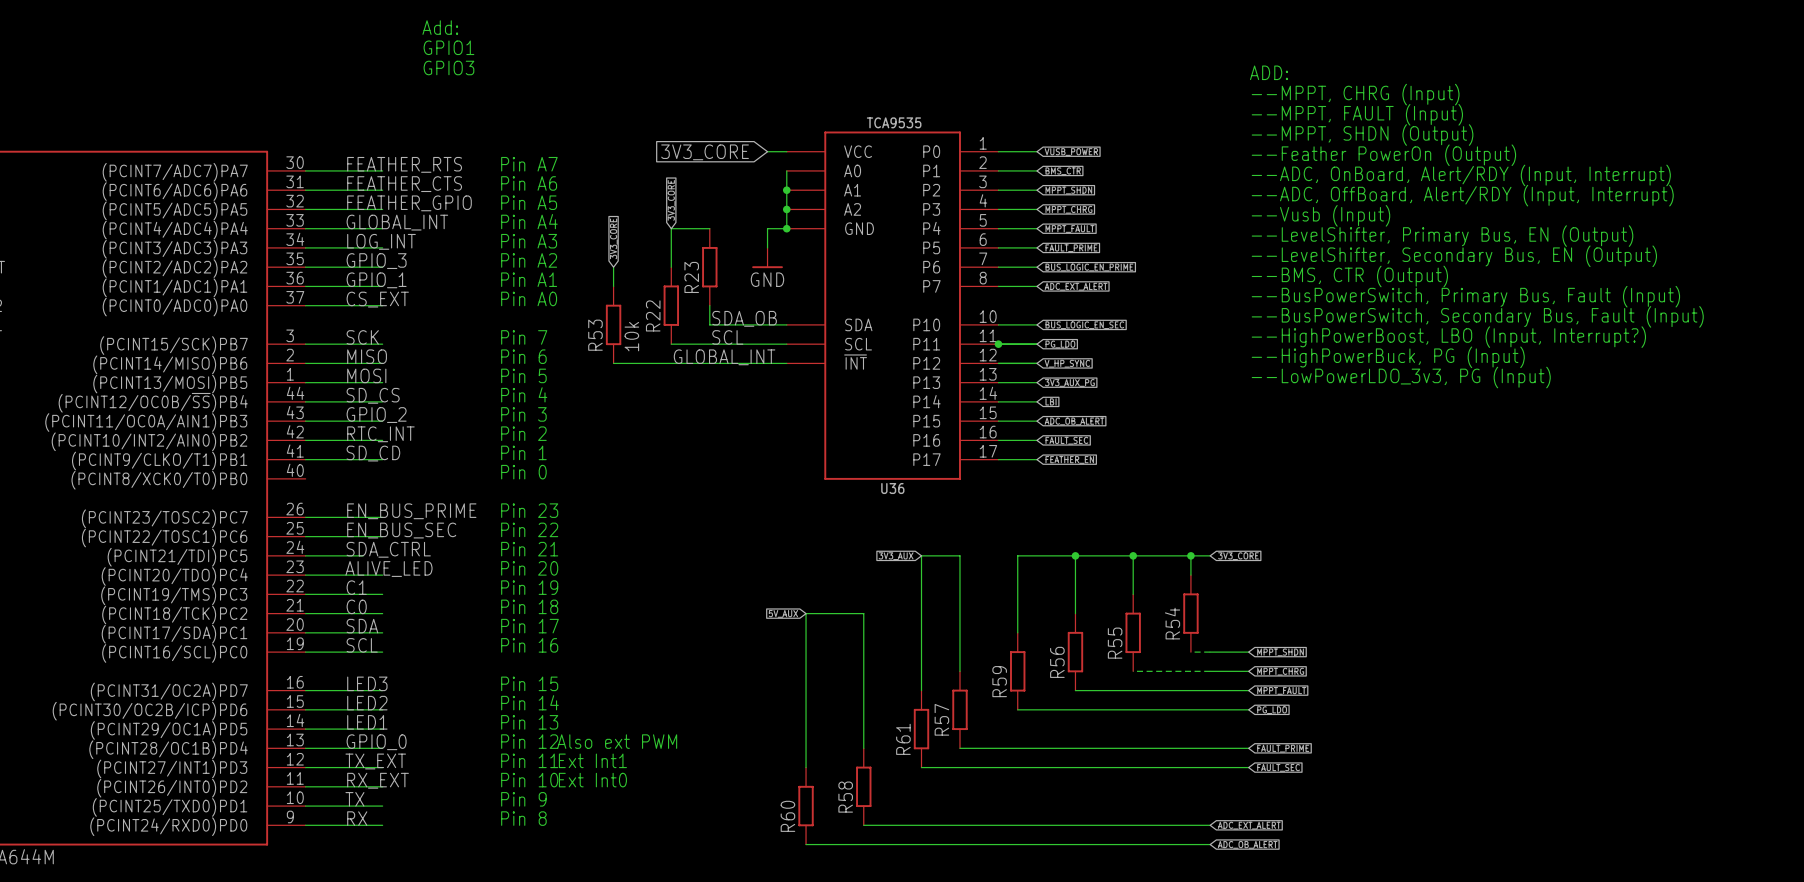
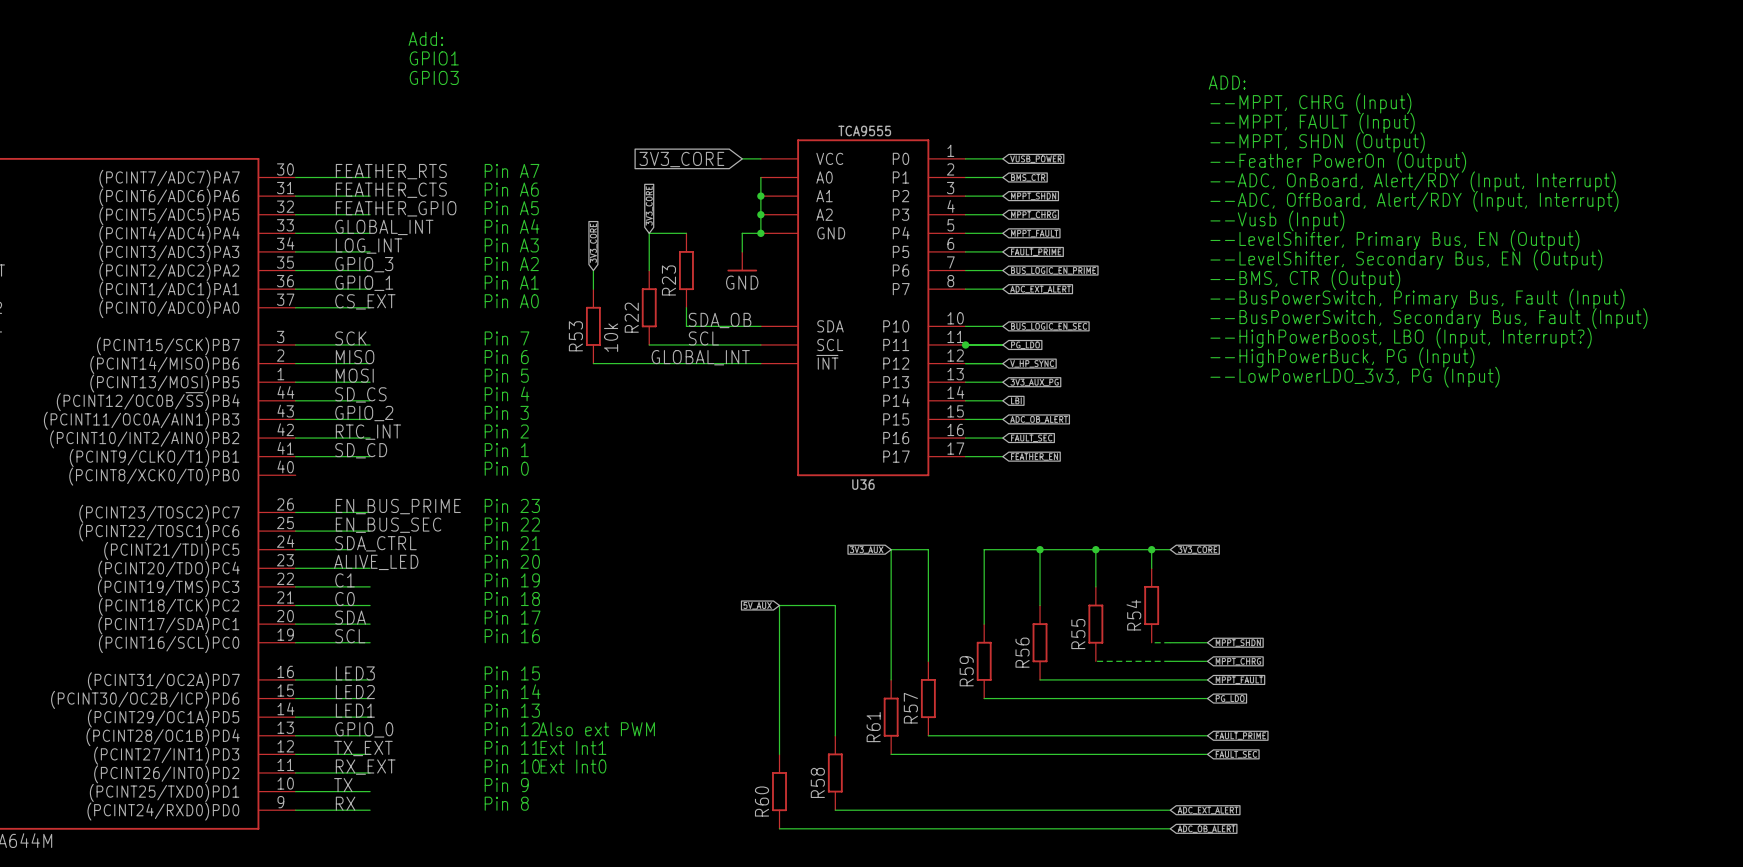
U36 text: none -> TCA9555 (864, 130)
U36 text: TCA9535 (894, 122) -> none

